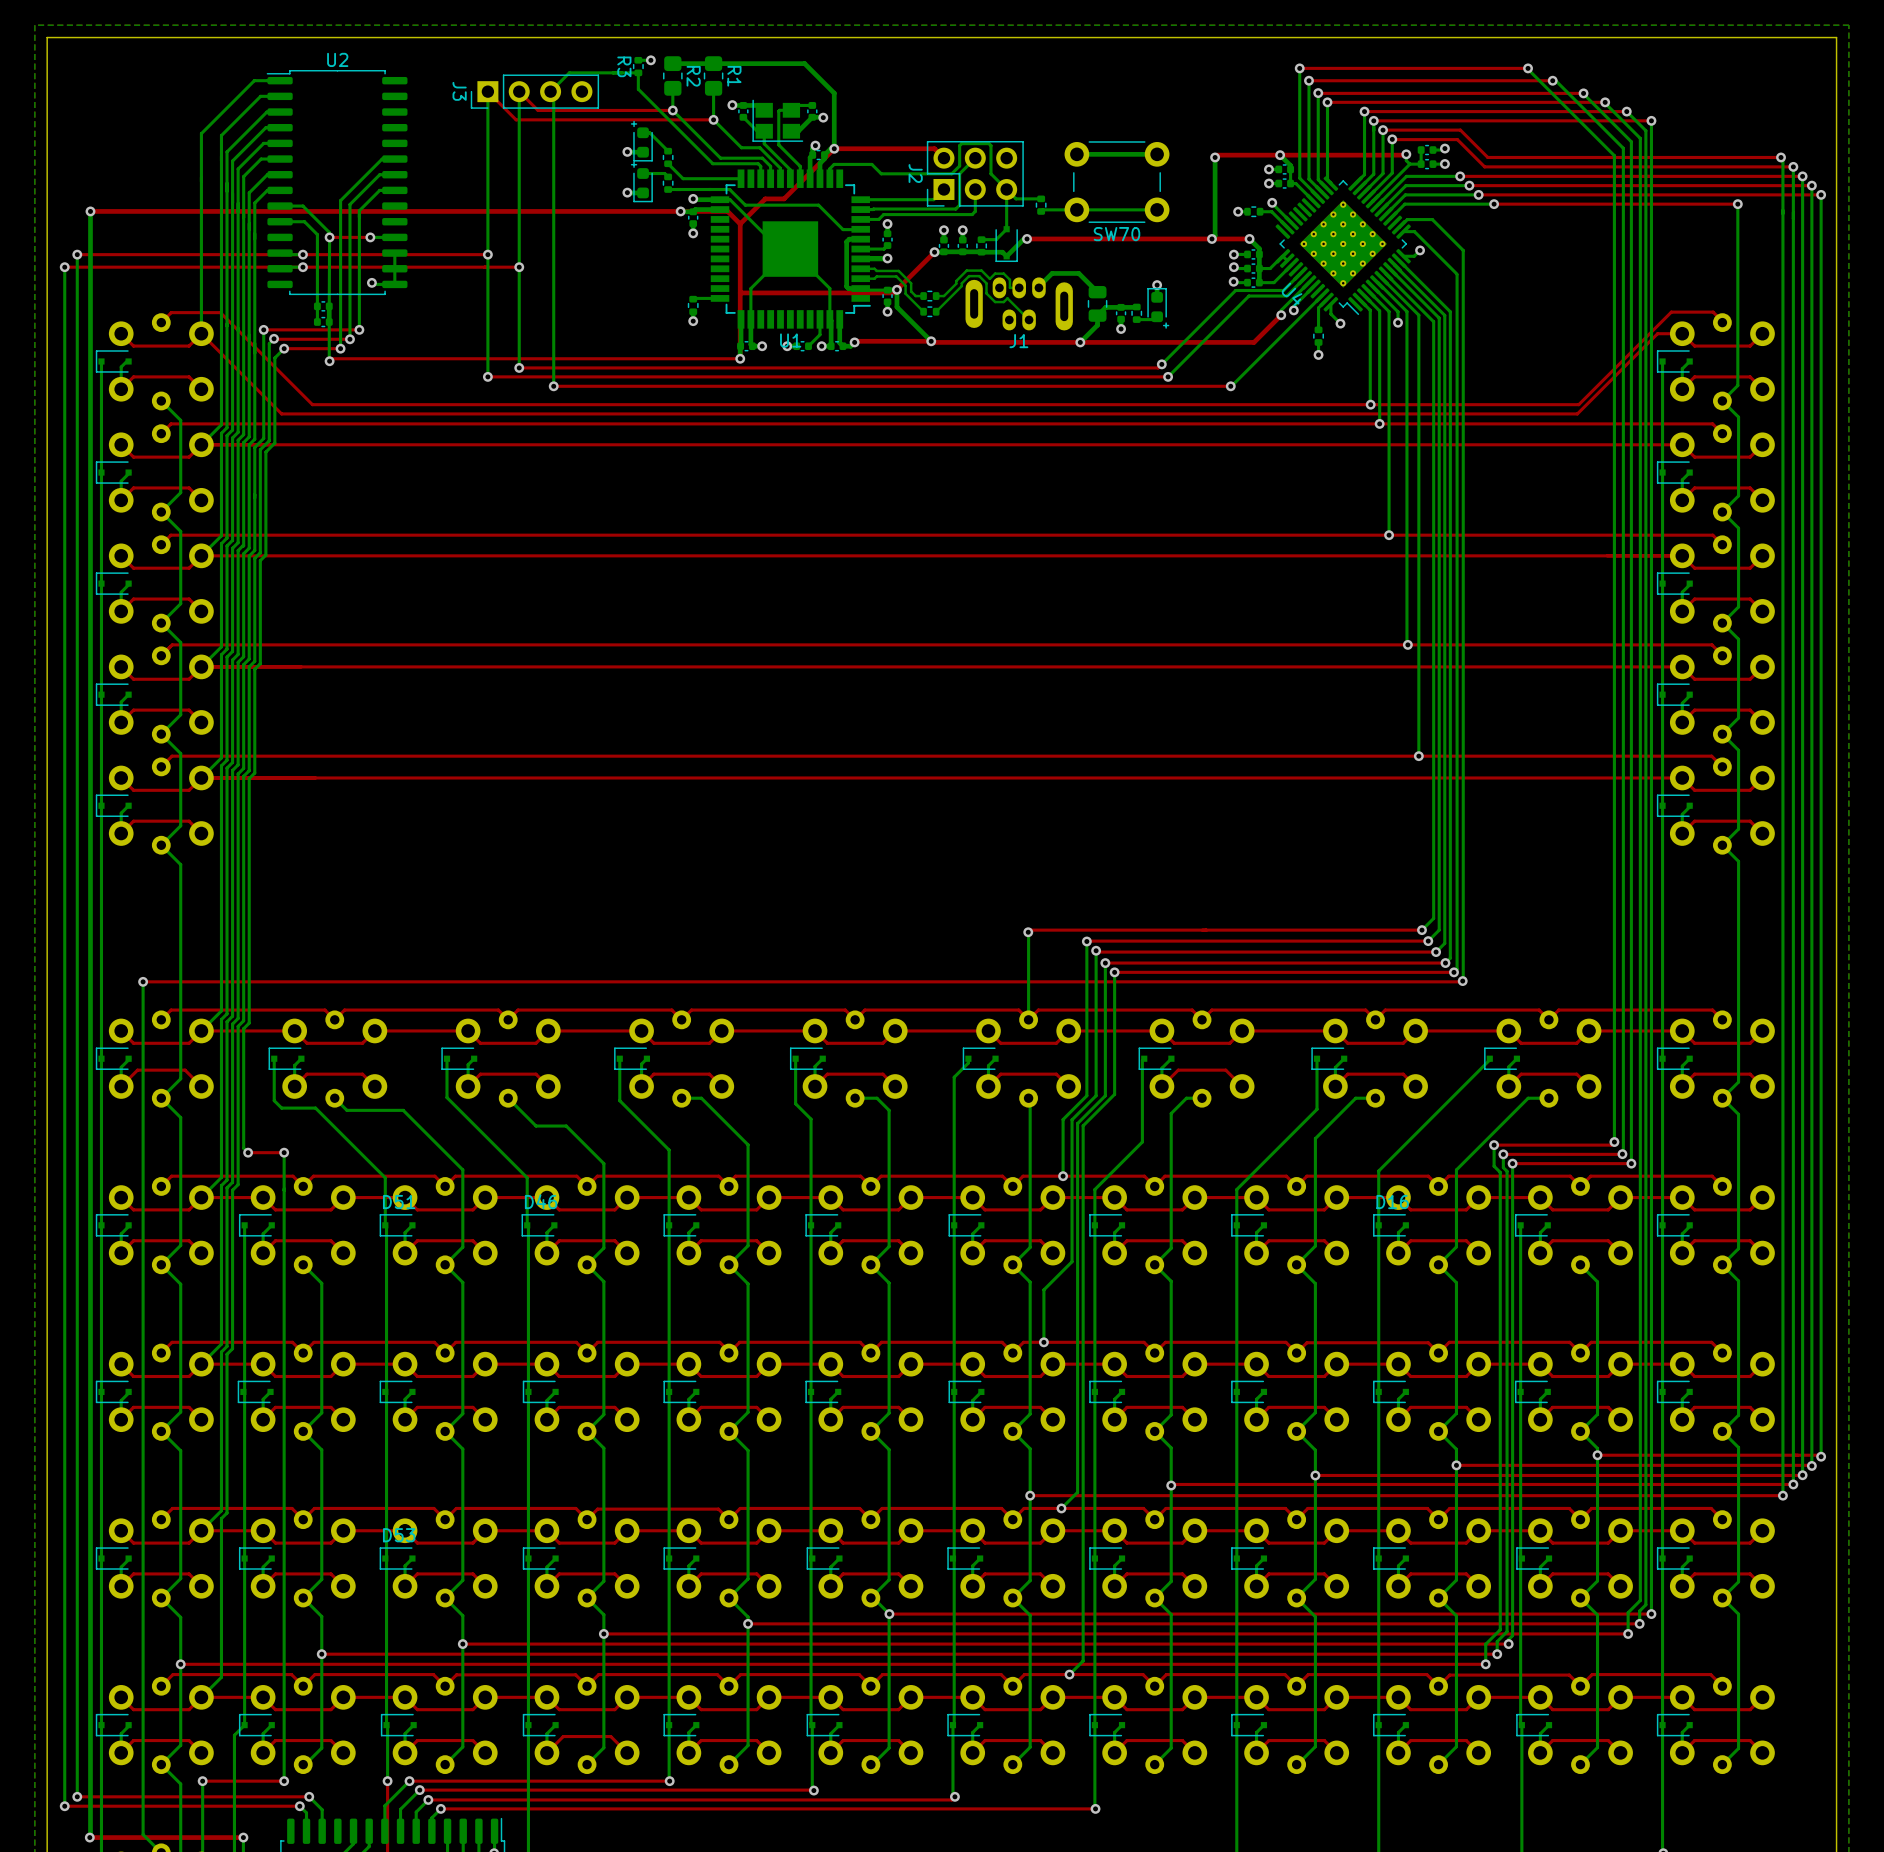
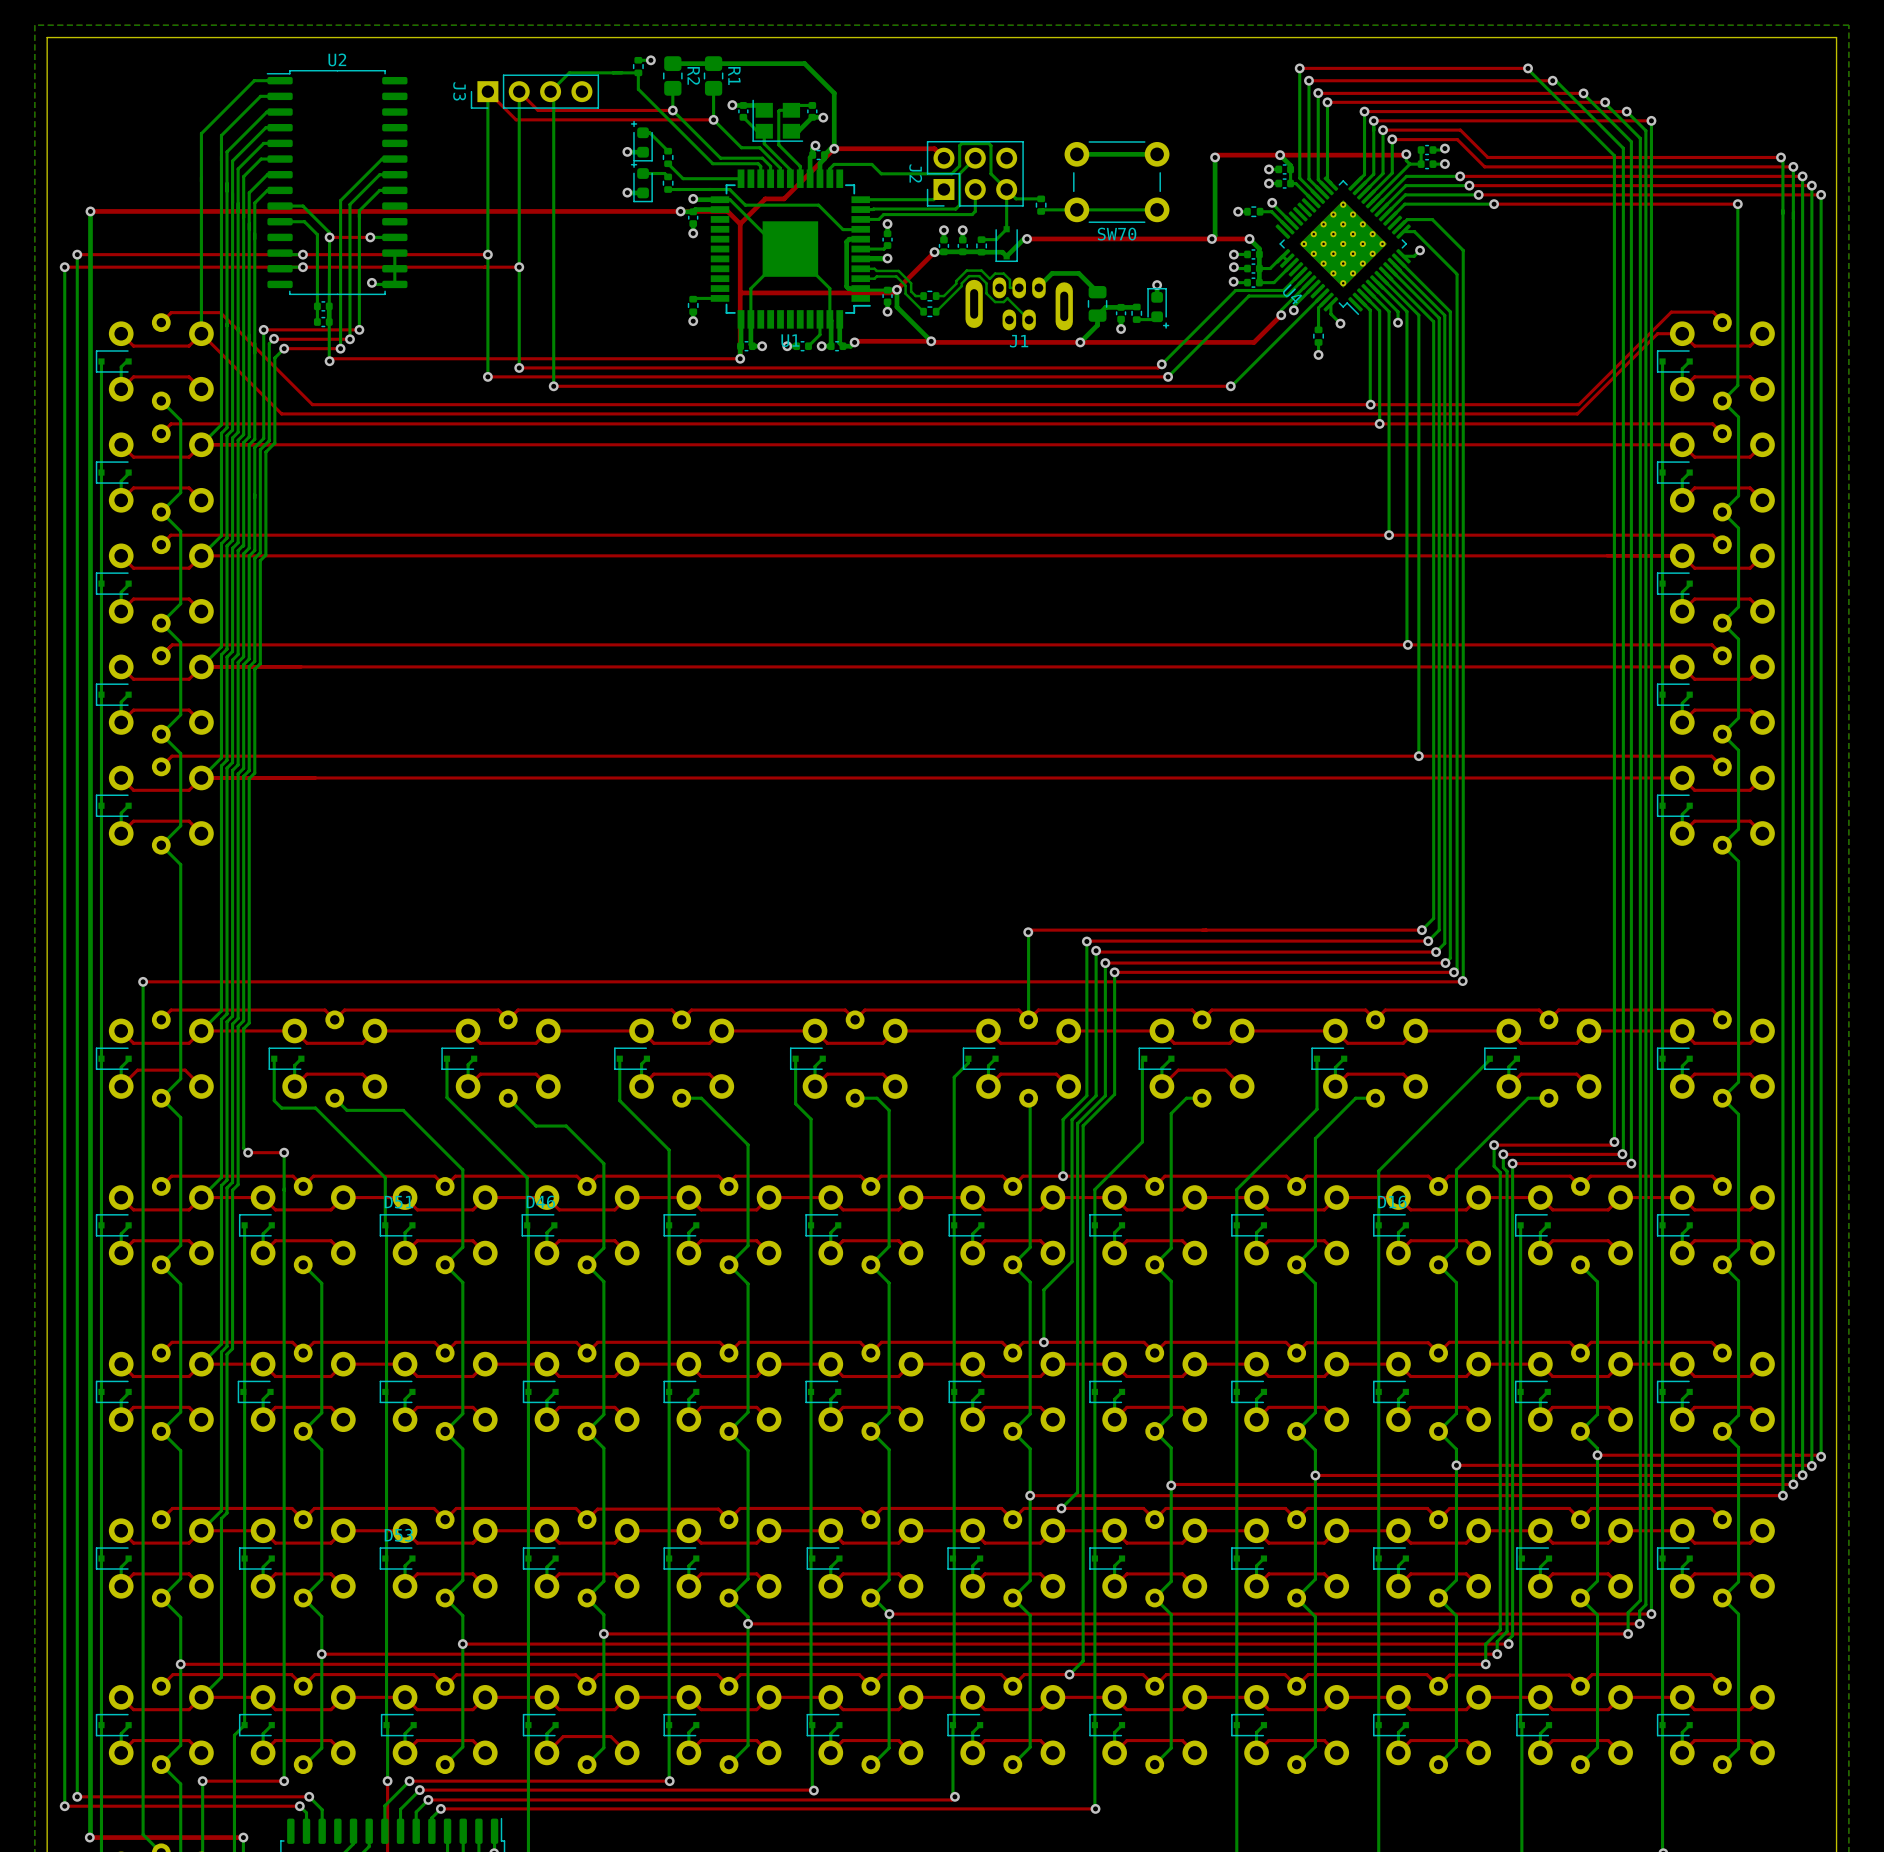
R3 name: R3 (624, 66) -> none

